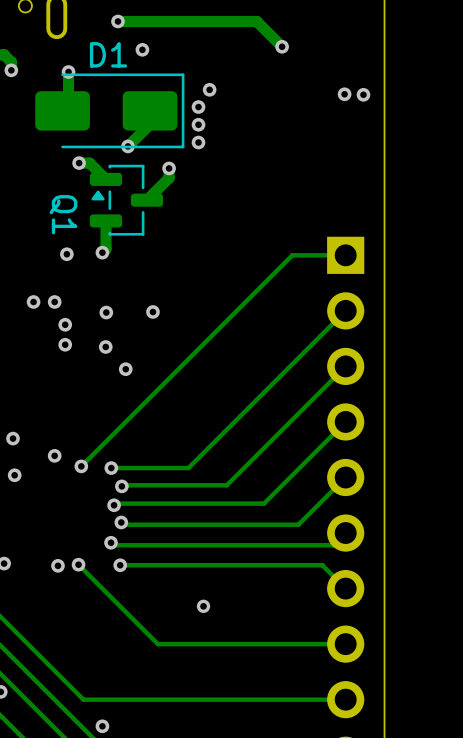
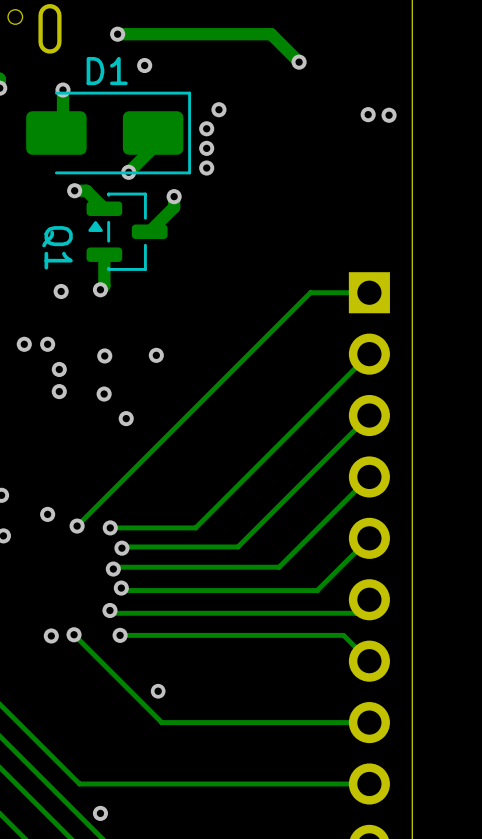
via position: (203, 606) -> (158, 691)

